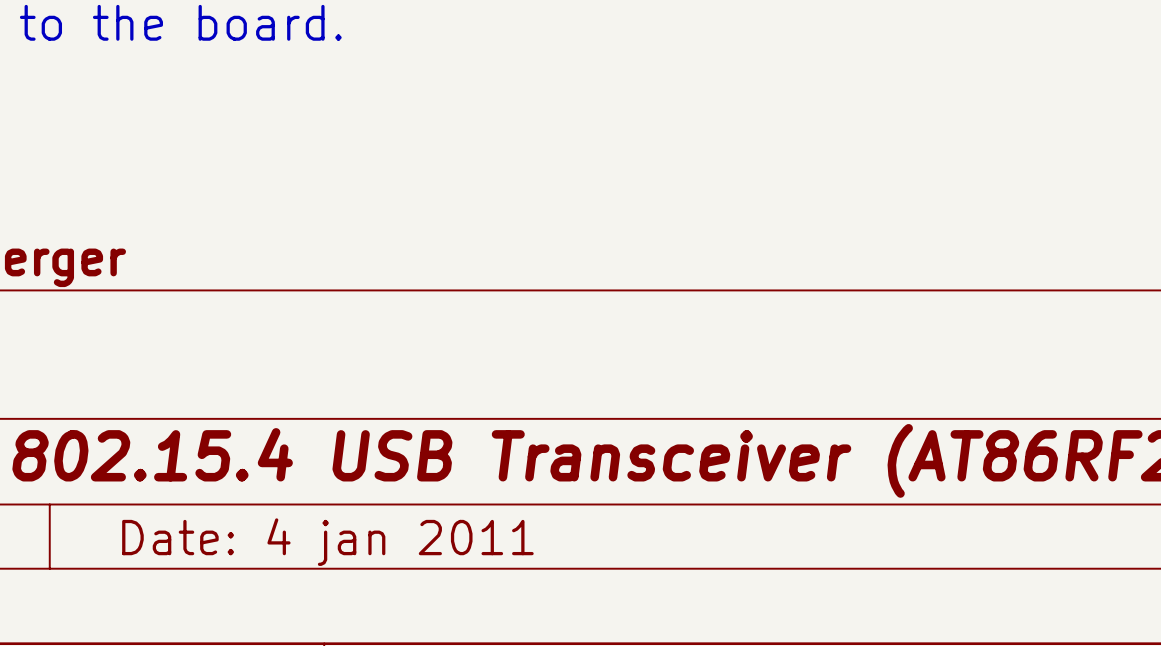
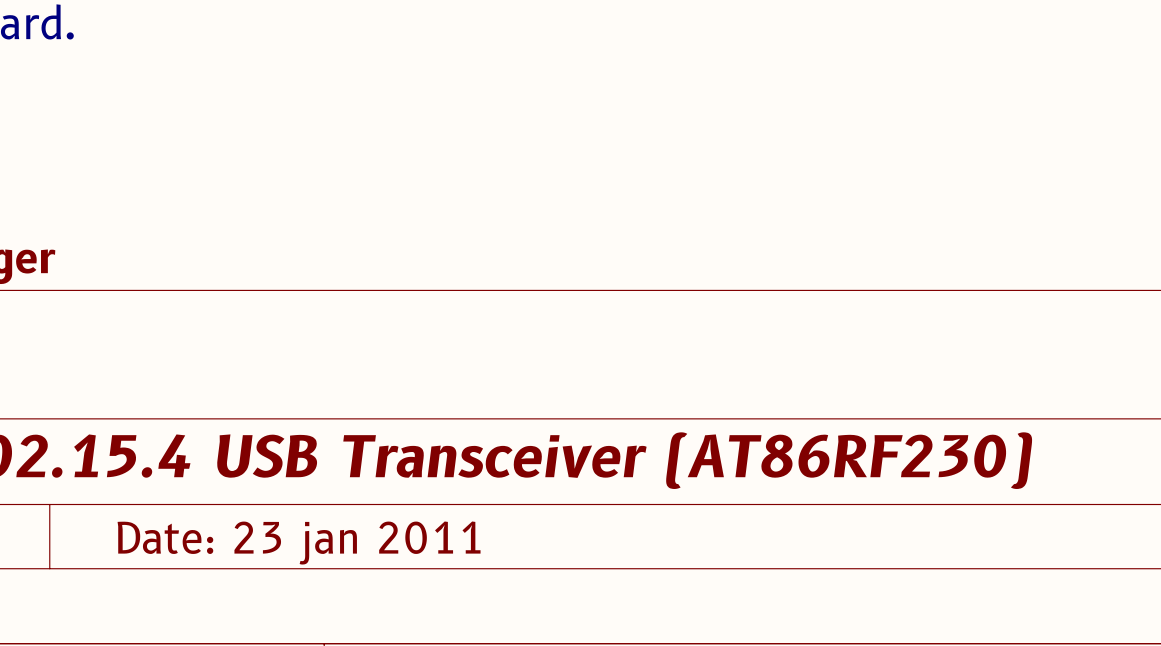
title block: Date: 4 jan 2011 (327, 542) -> Date: 23 jan 2011 (299, 543)

